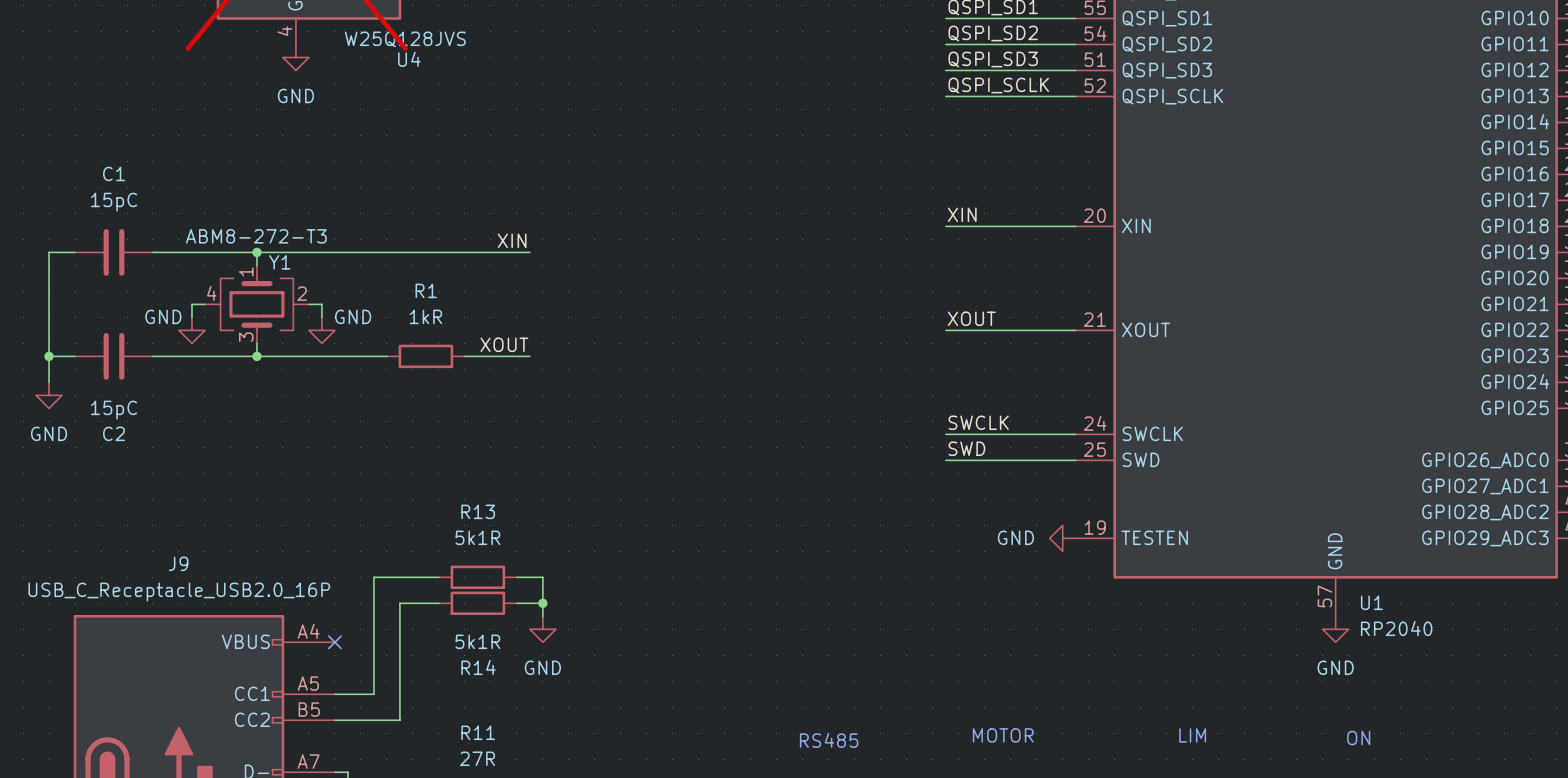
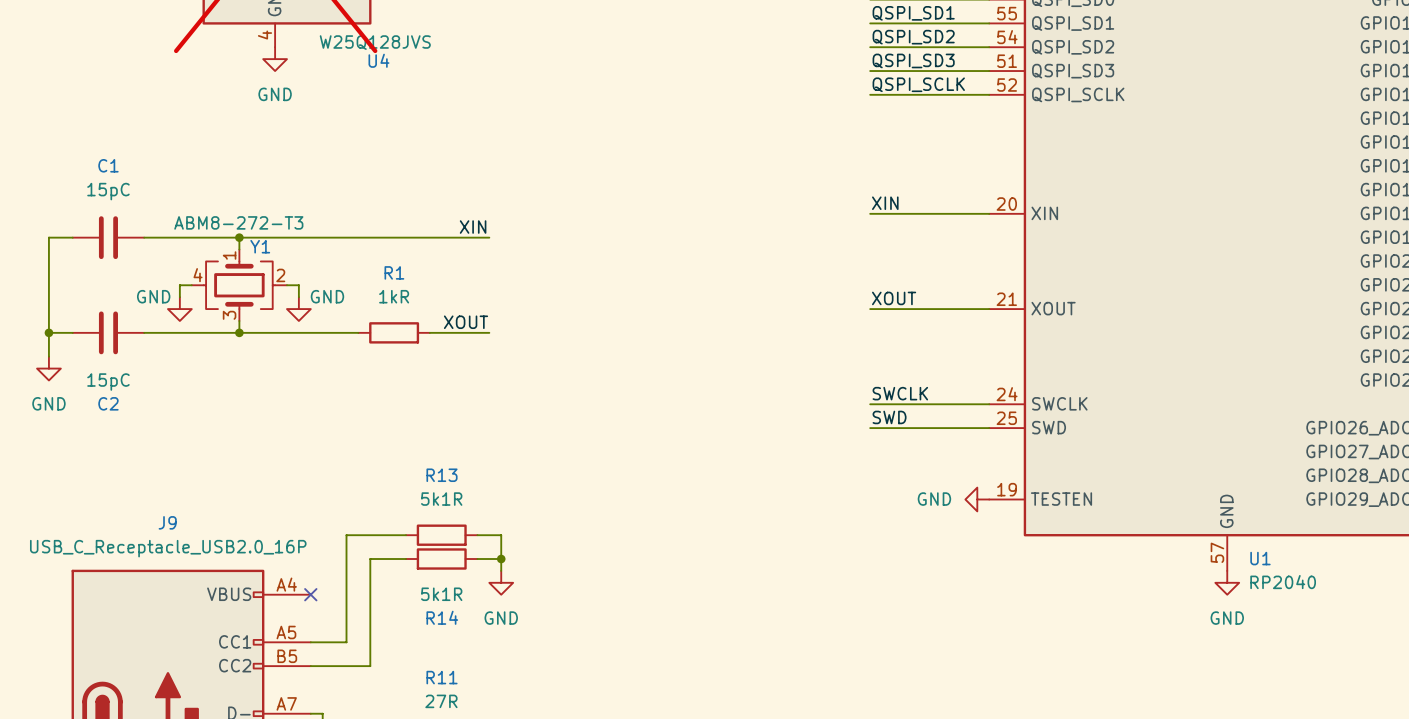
text: MOTOR (1003, 735) -> none
text: LIM (1192, 735) -> none
text: ON (1358, 738) -> none
text: RS485 (829, 740) -> none

